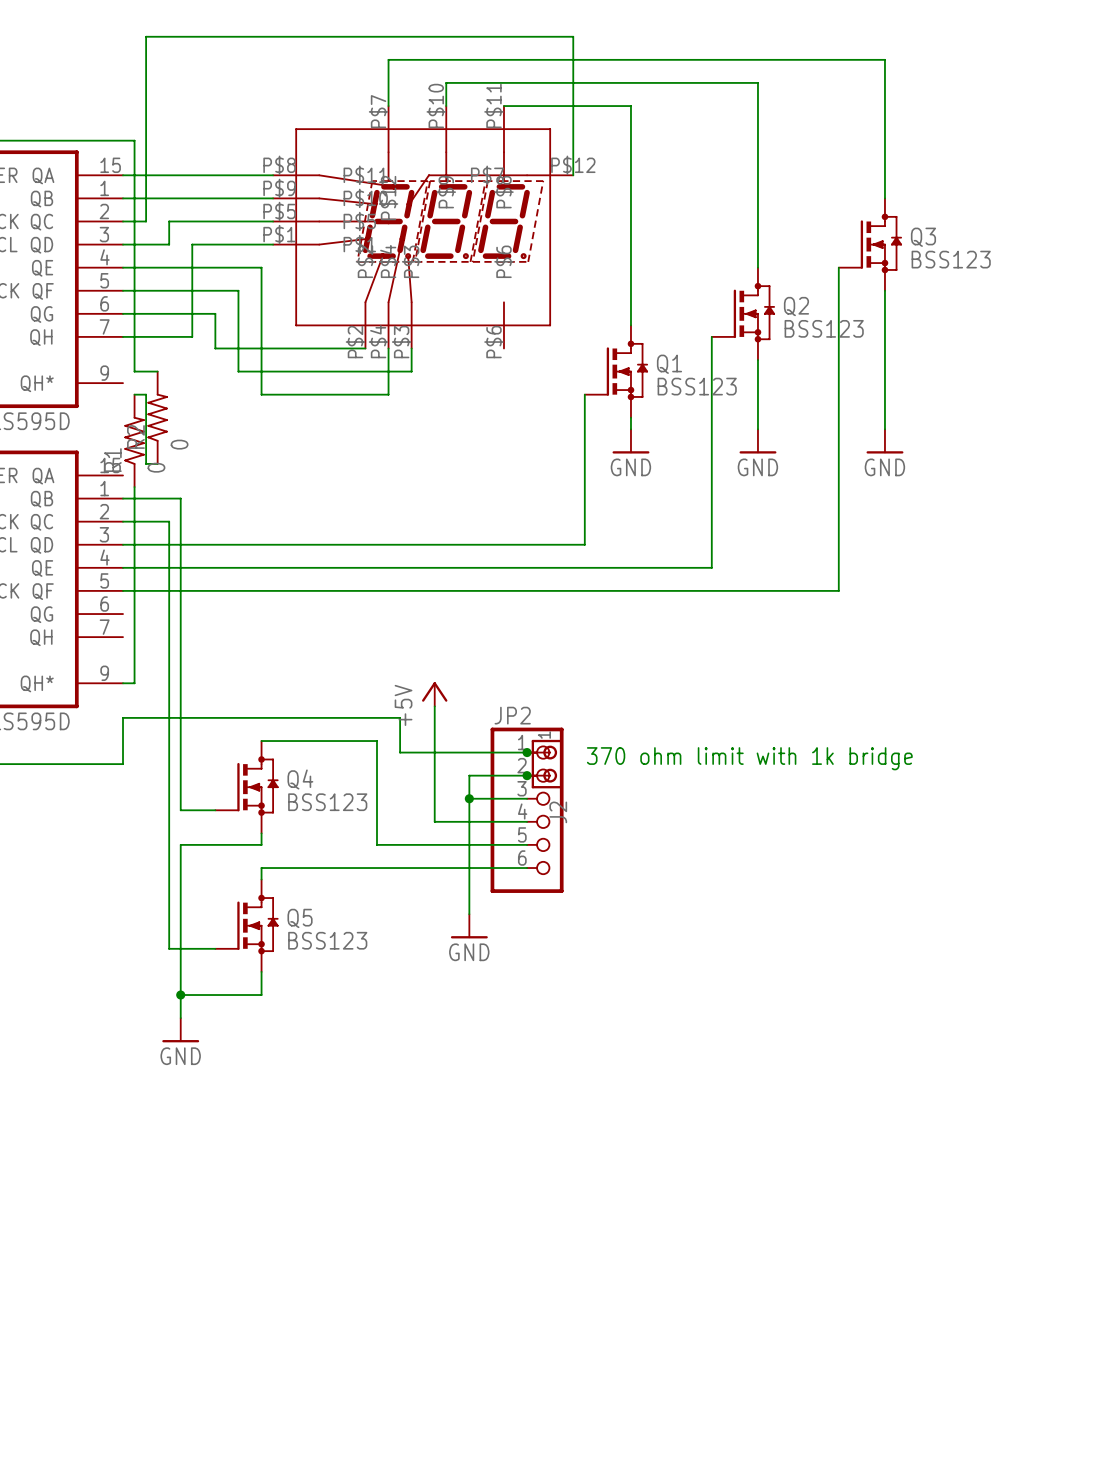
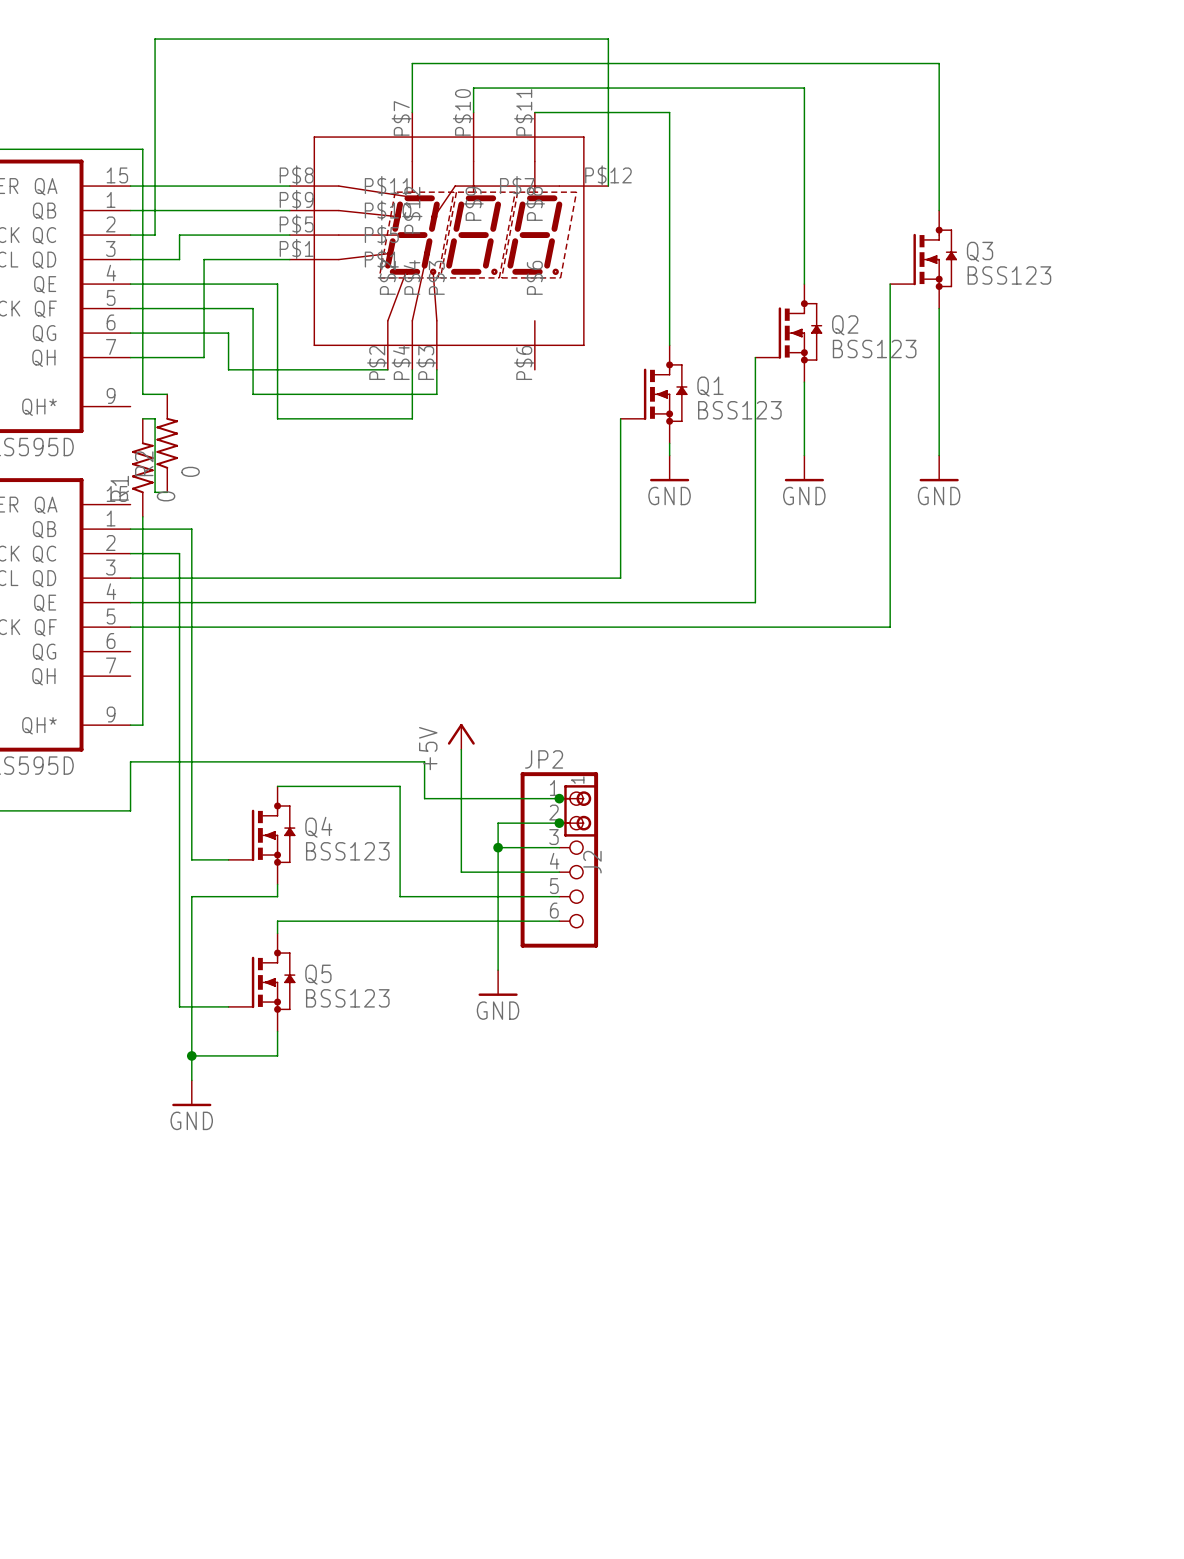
text: 370 ohm limit with 1k bridge (749, 758) -> none

